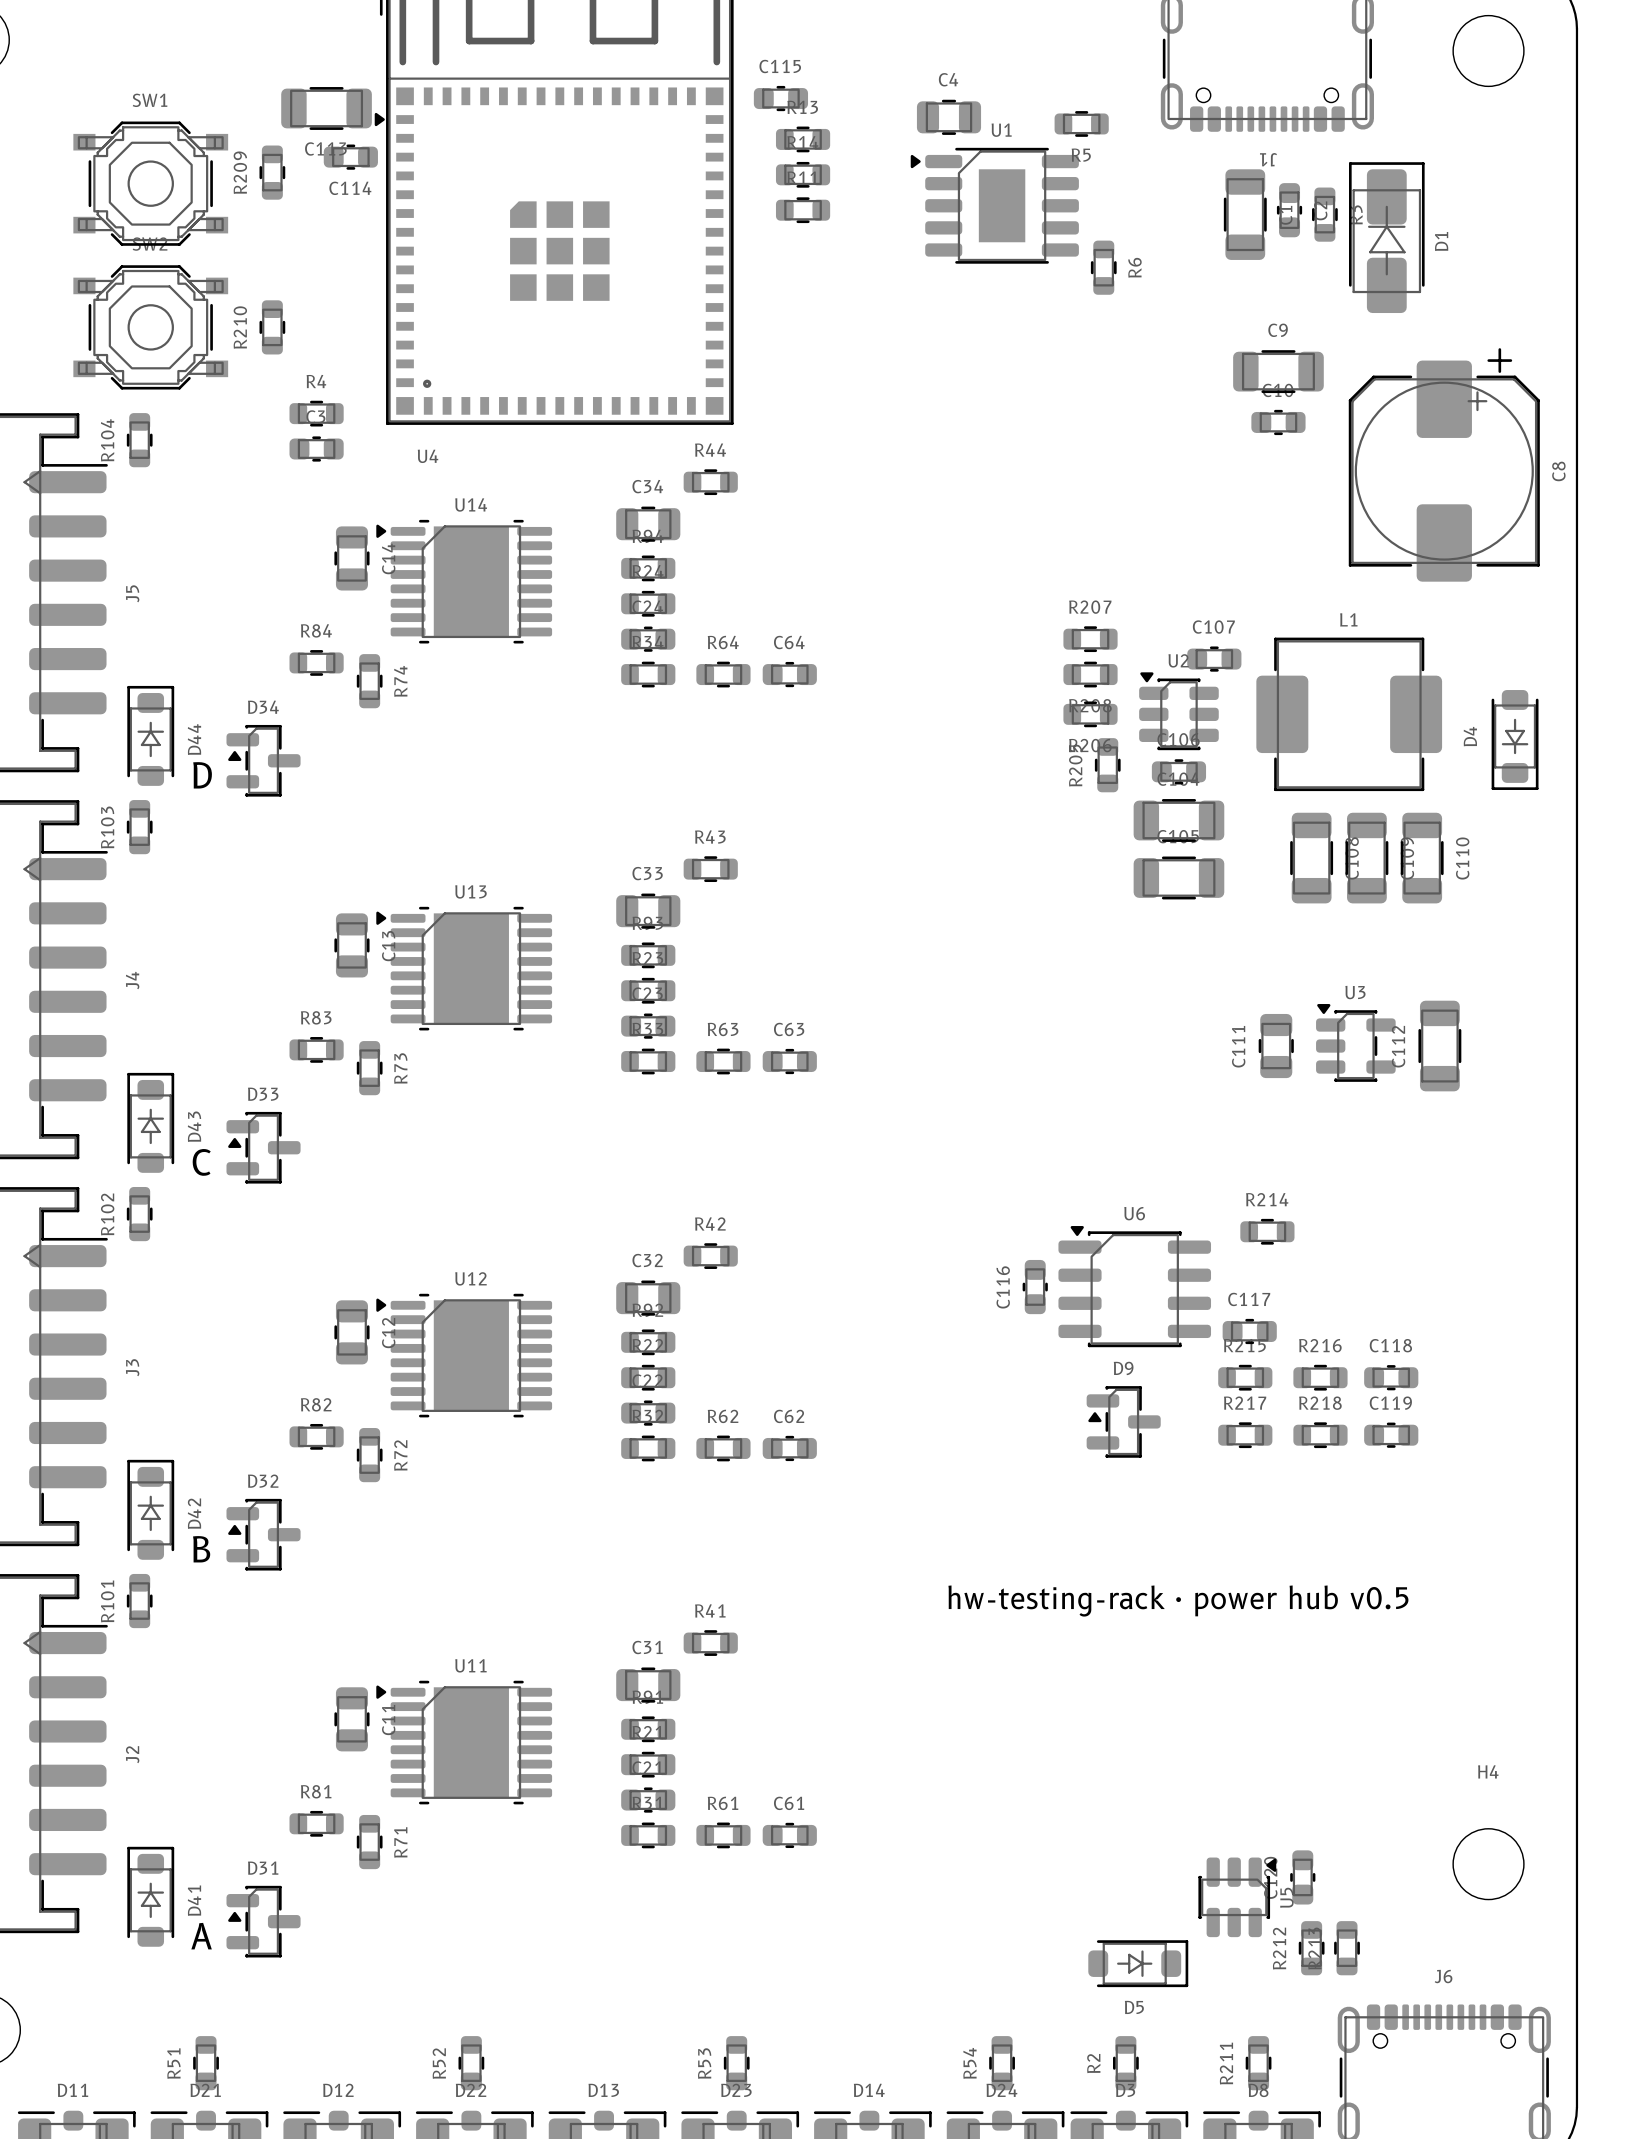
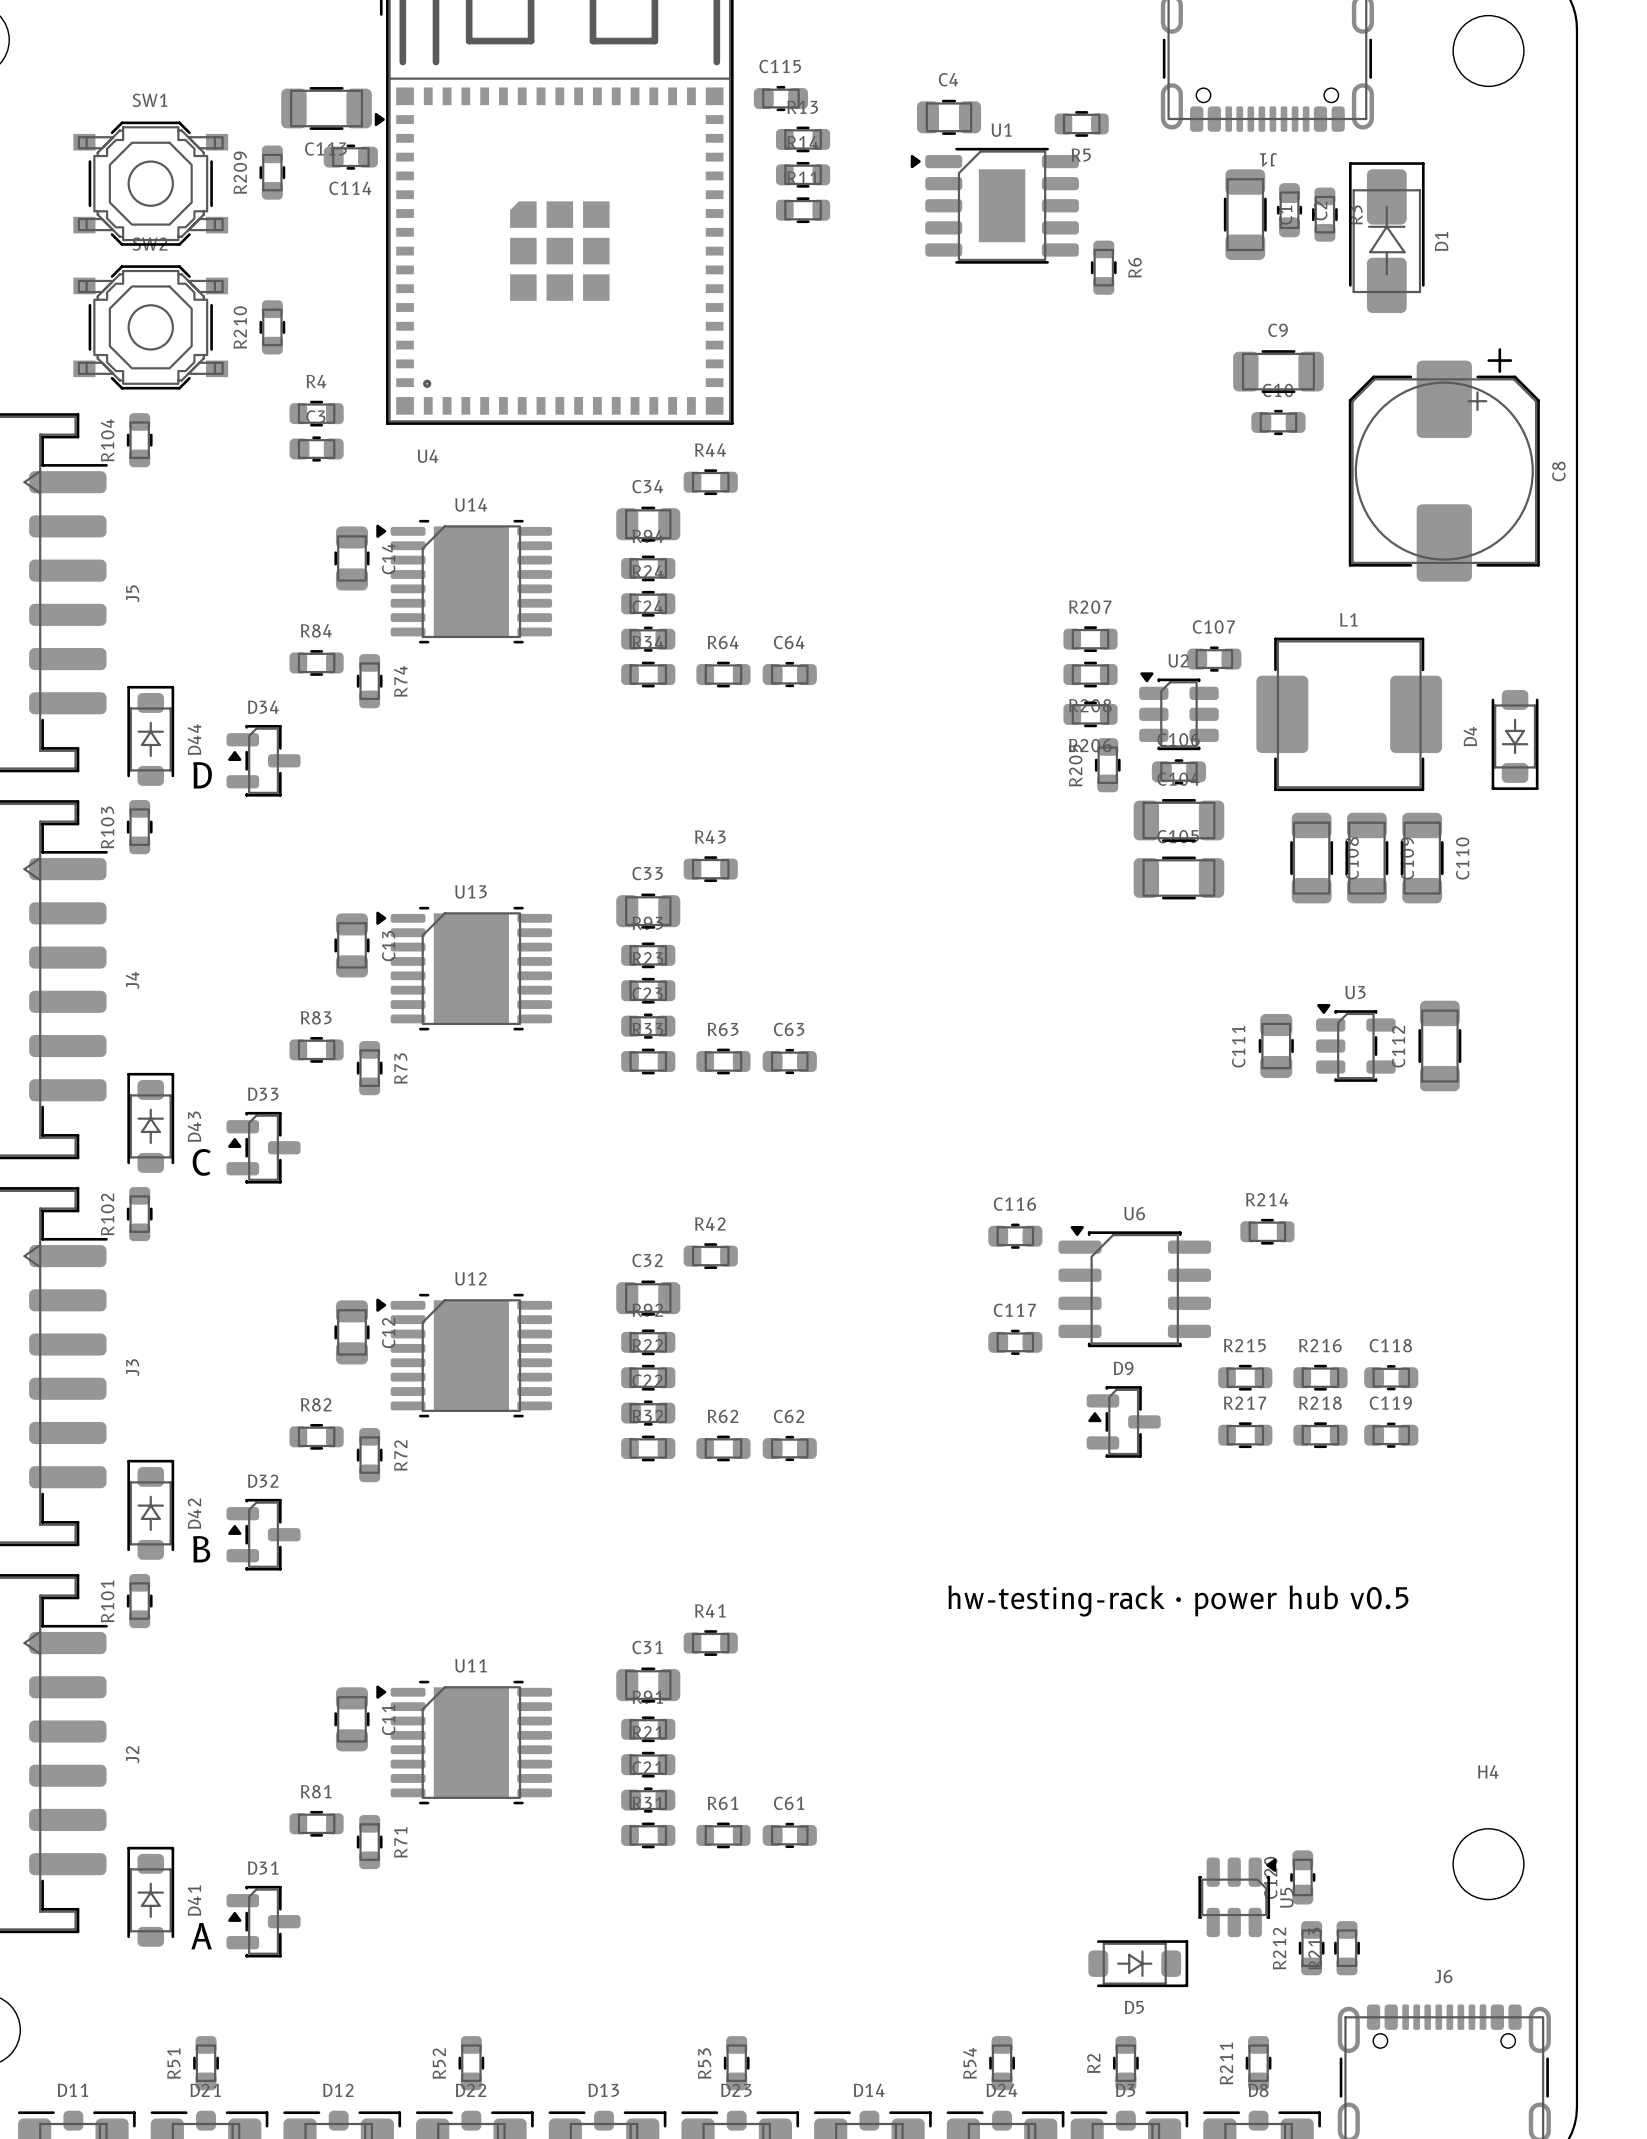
C116 rotation: 0° (1035, 1287) -> 90° clockwise (1015, 1236)
C116 position: (1035, 1287) -> (1015, 1236)
C117 position: (1249, 1331) -> (1015, 1342)

